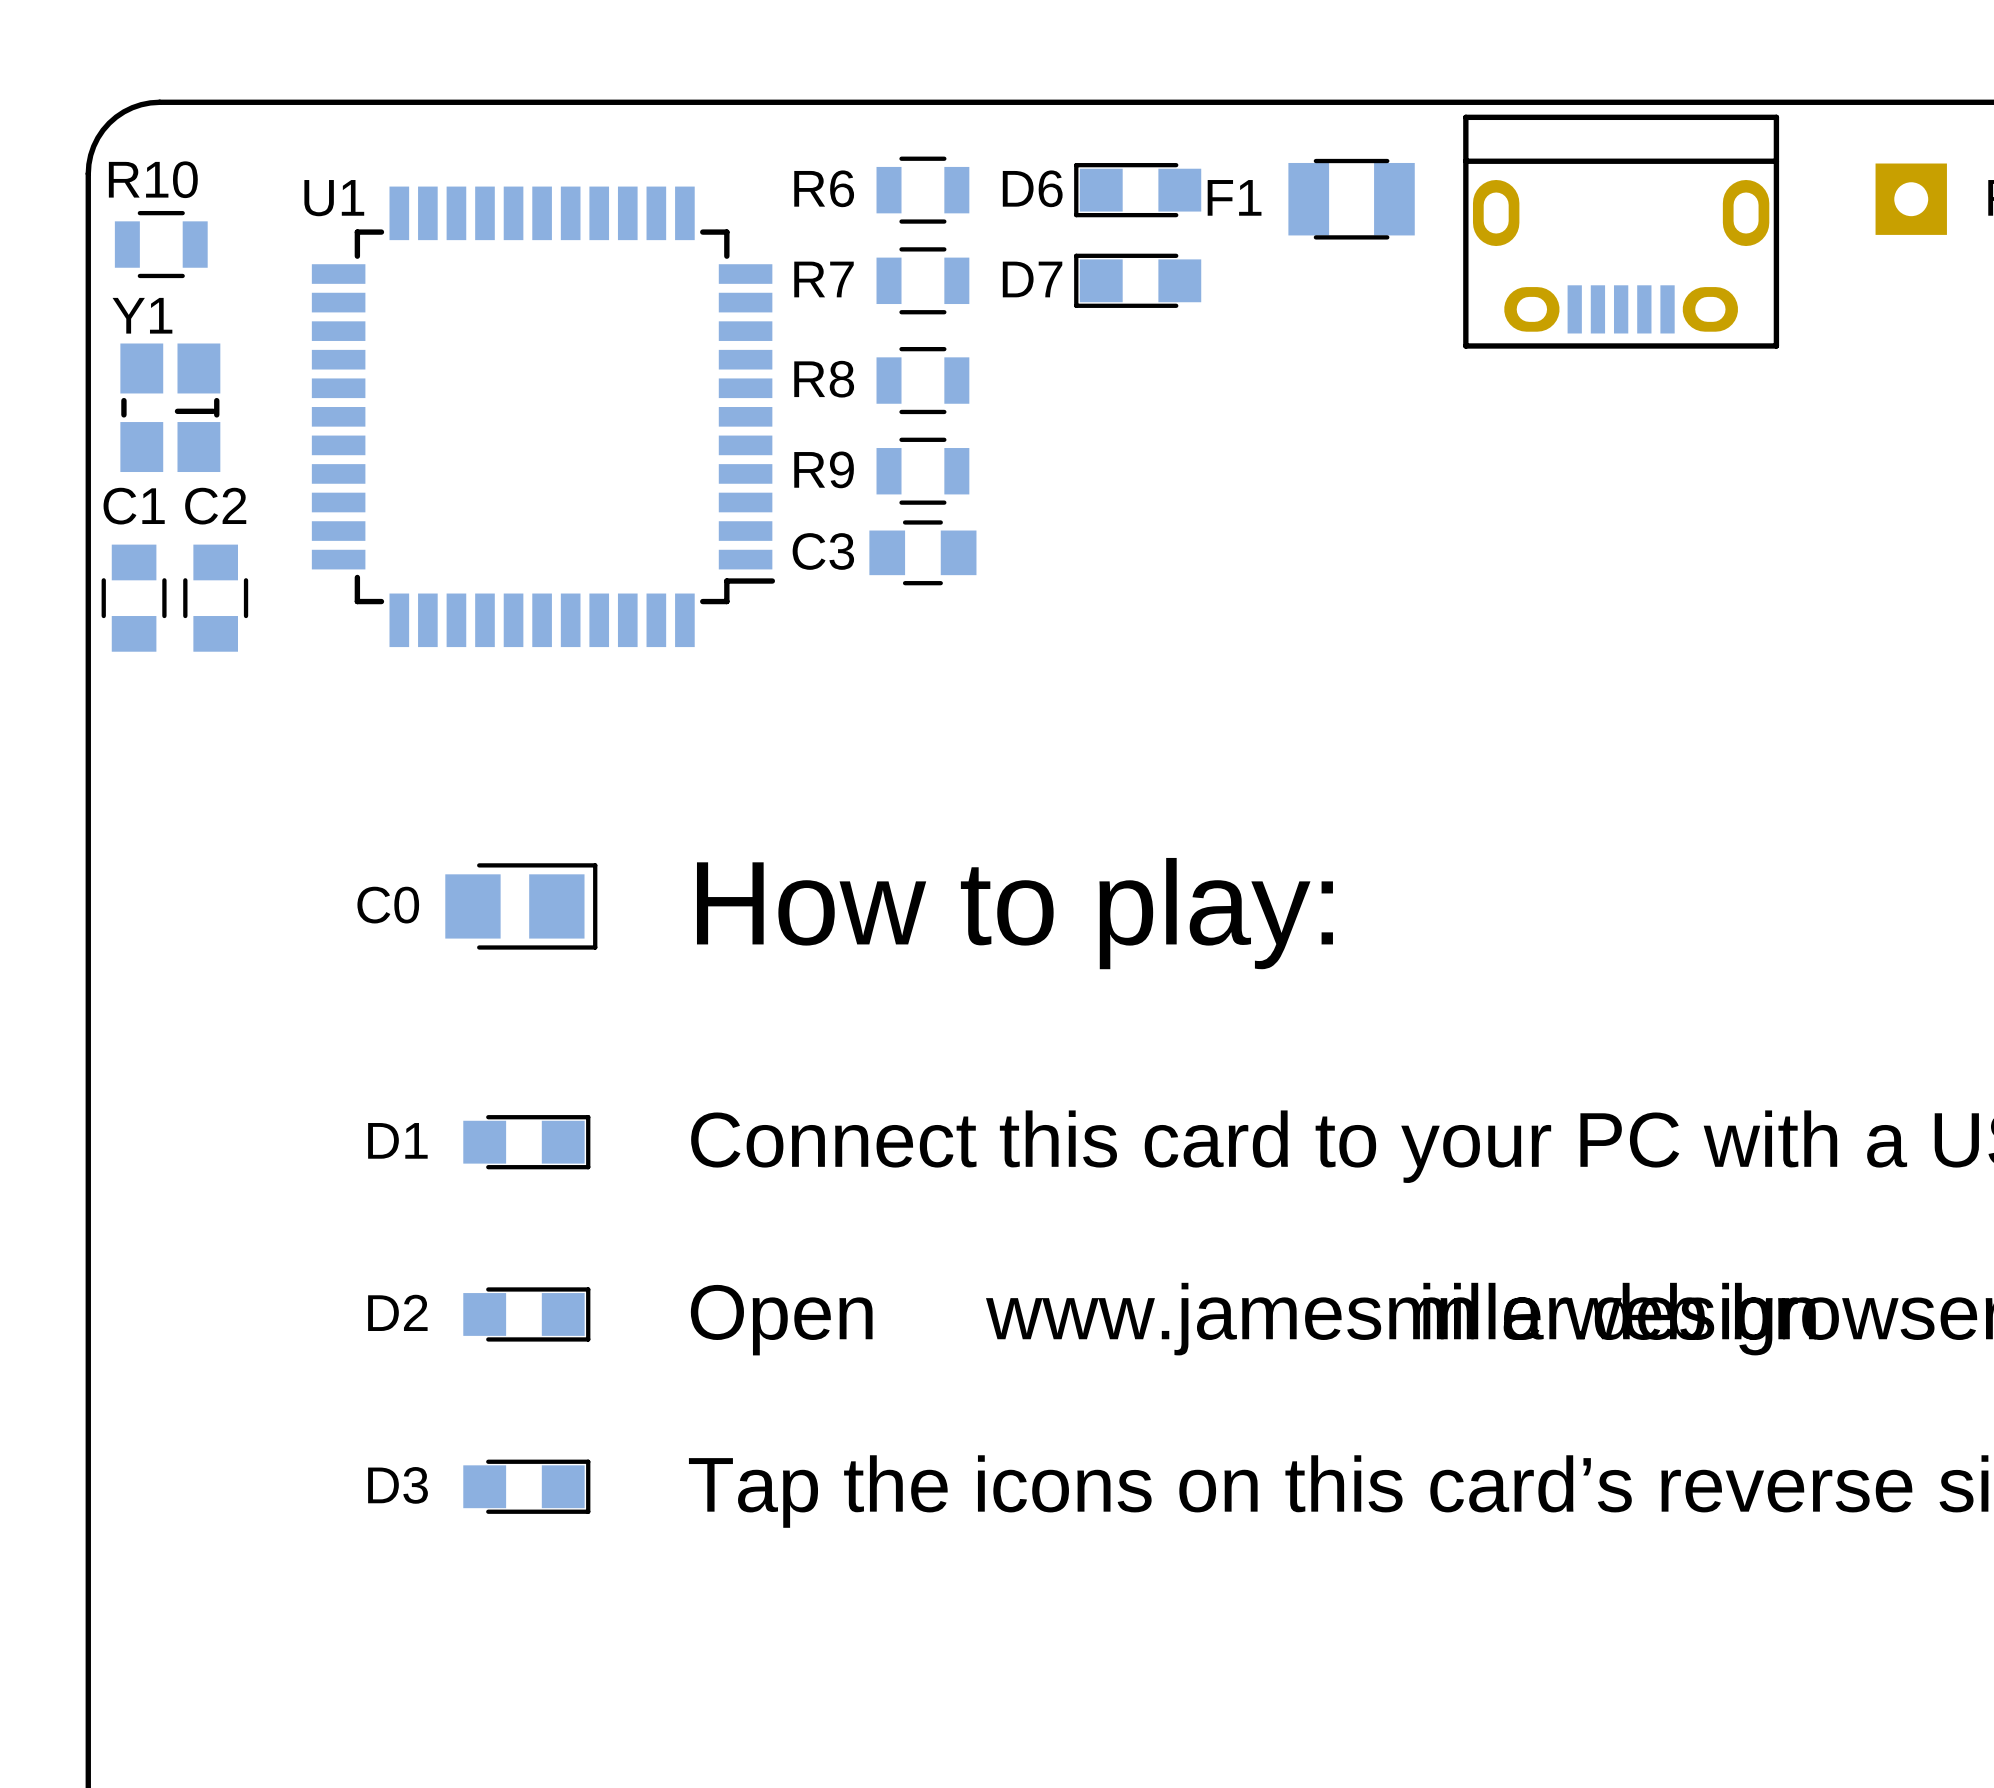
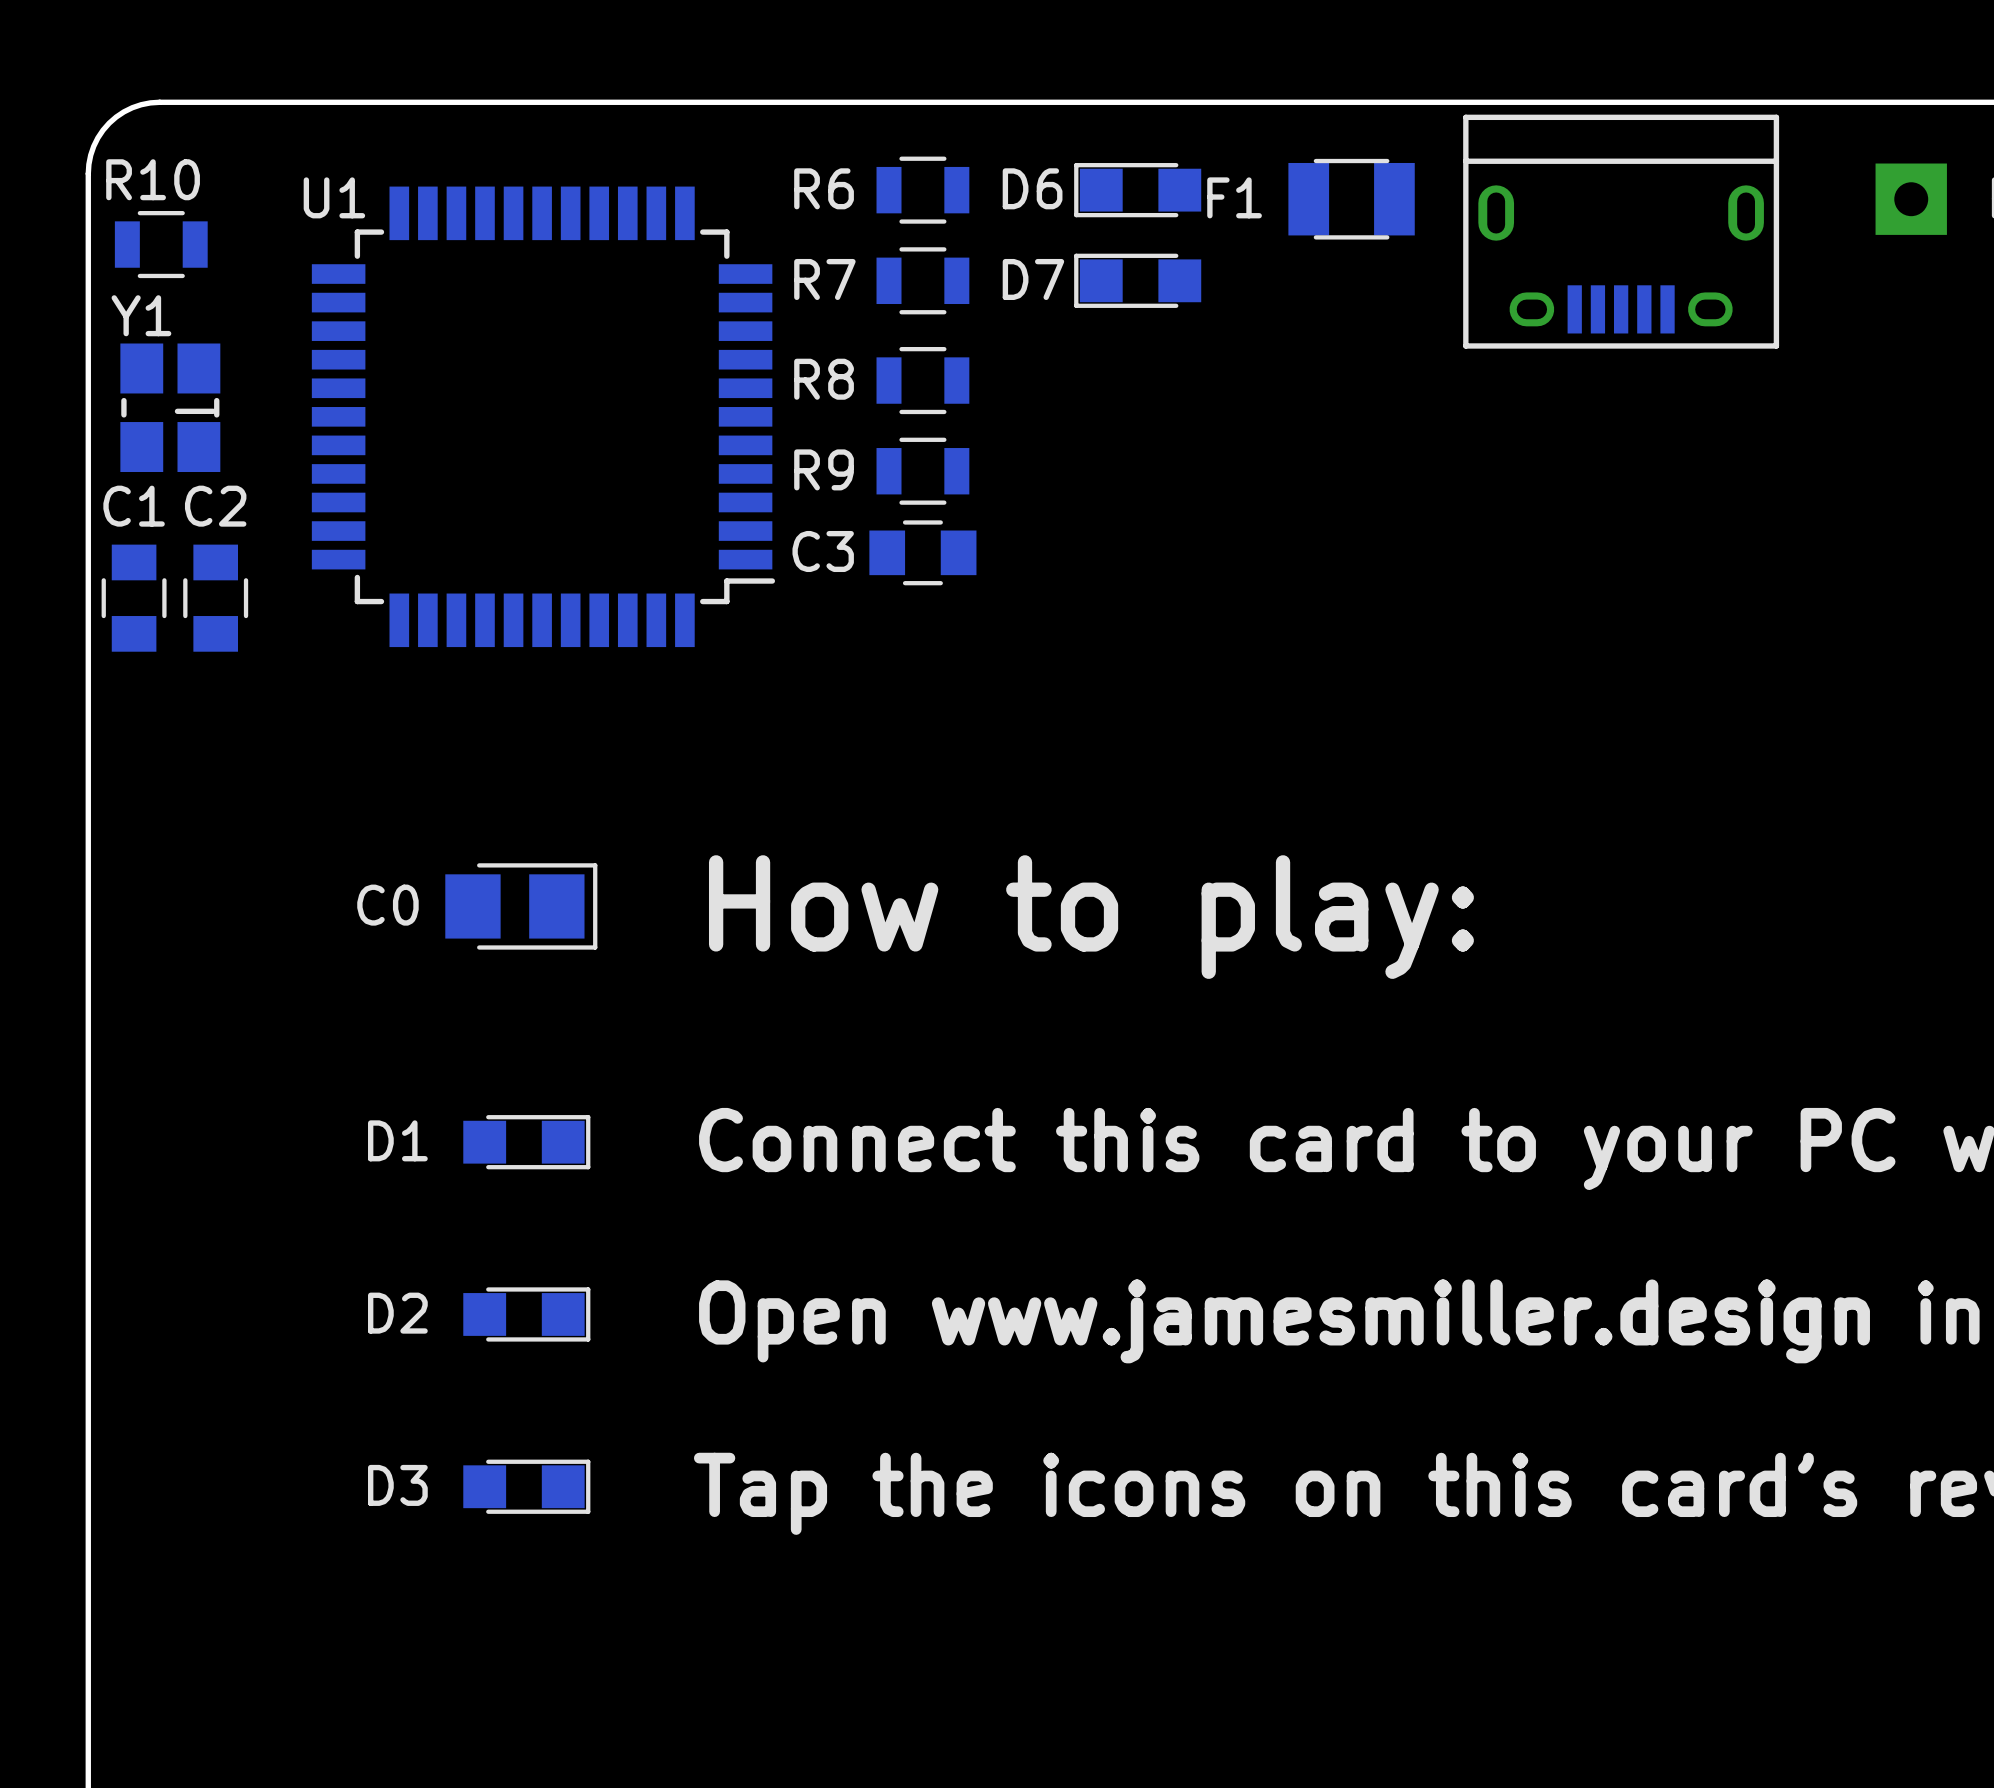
part footprint: [1463, 114, 1780, 349] -> [1463, 114, 1780, 349]

